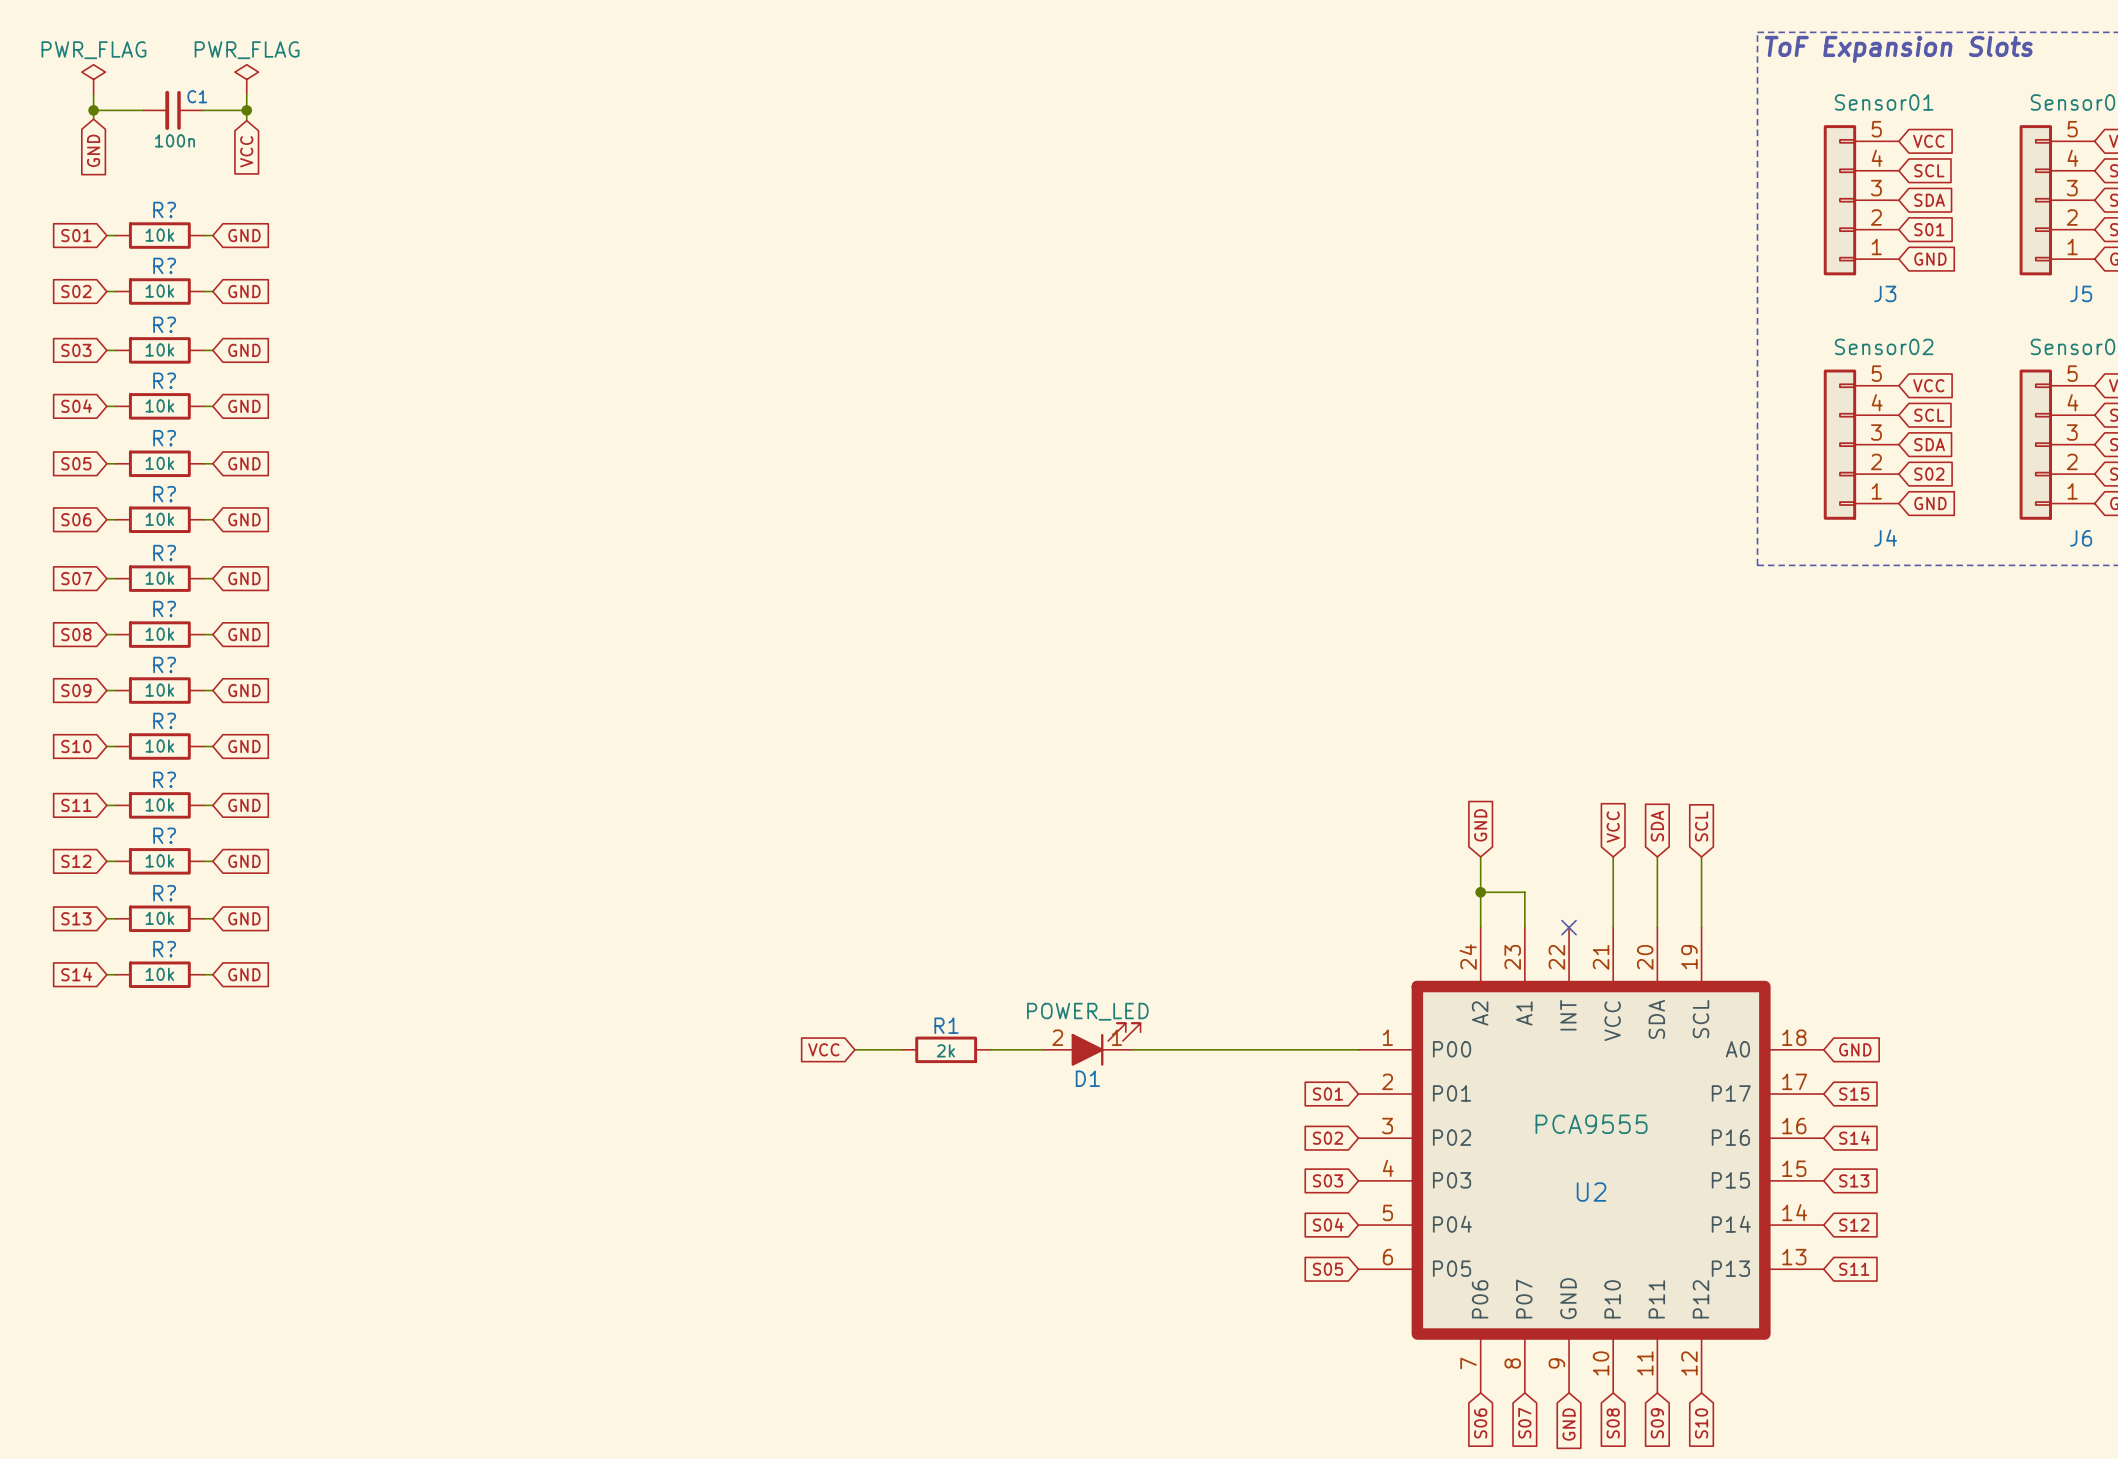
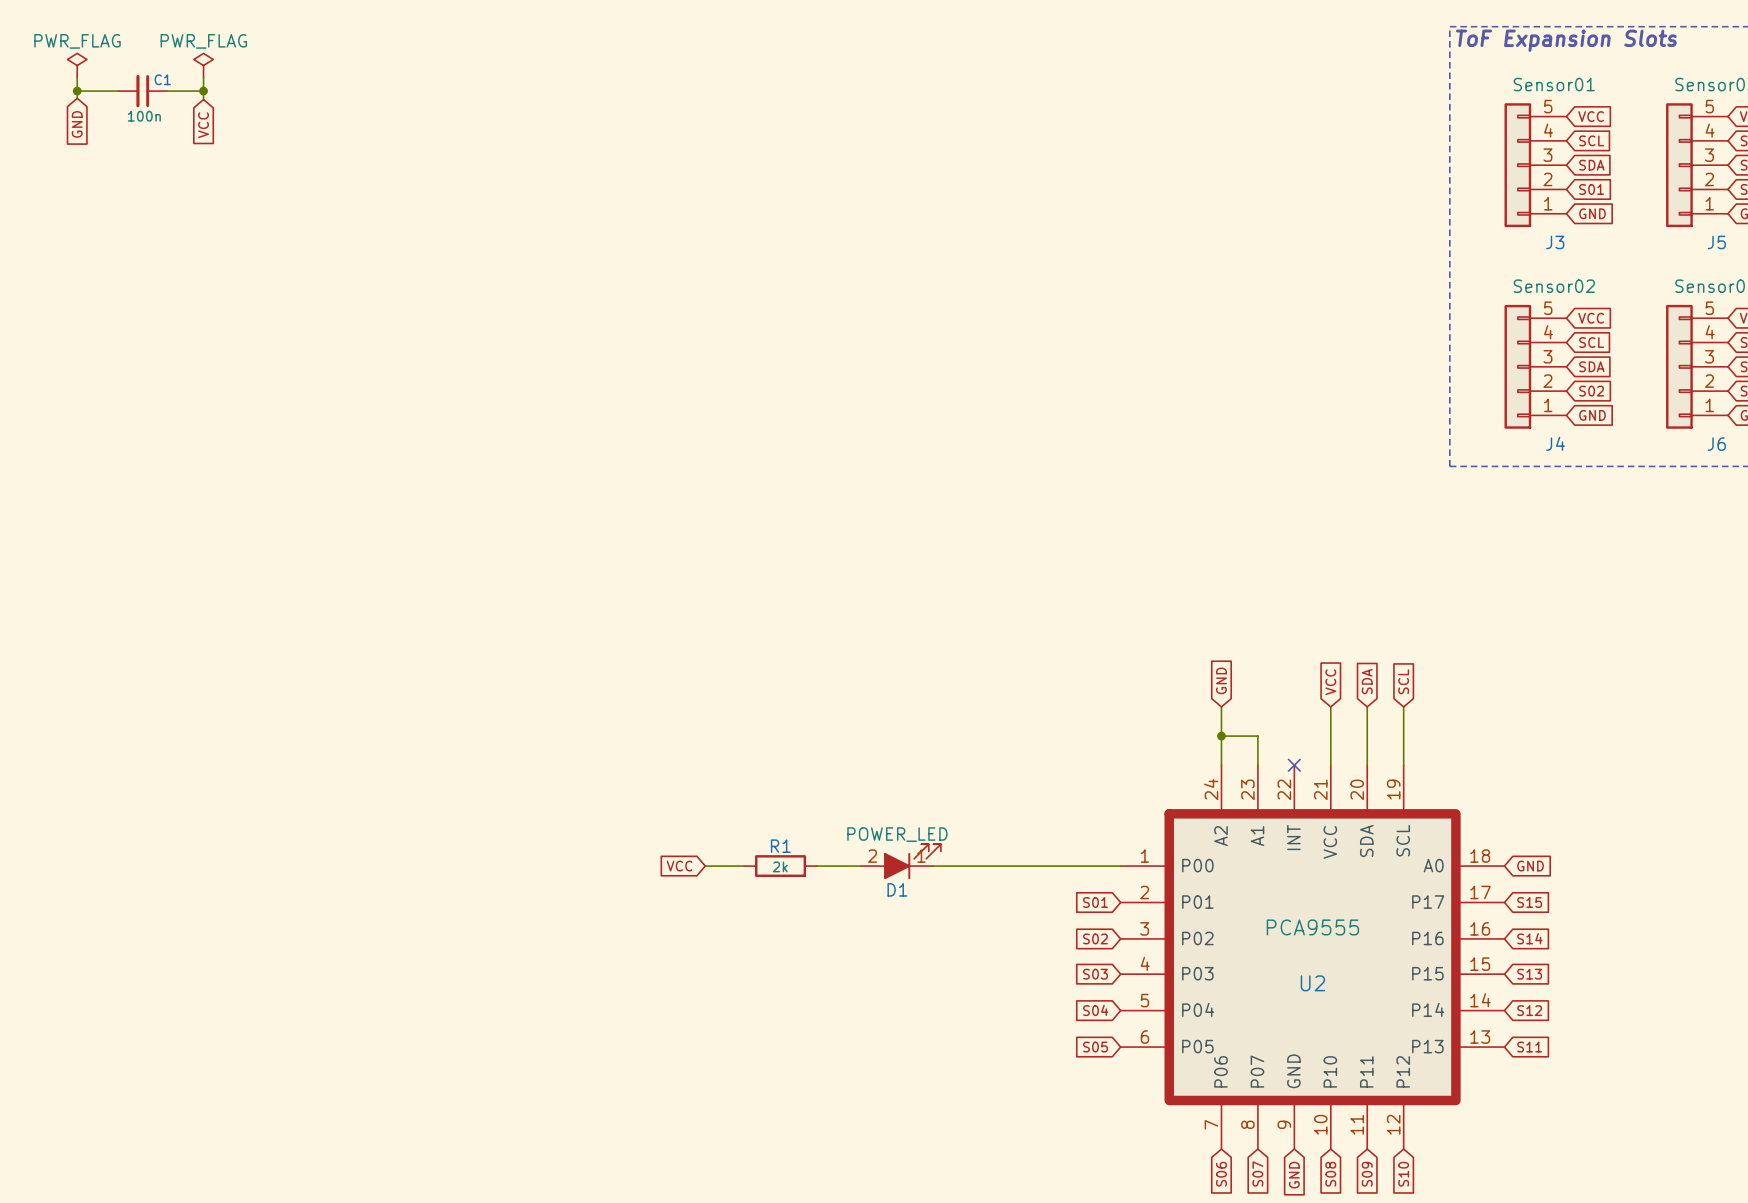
global label: S01 (76, 235) -> none
wire: (106, 235) (115, 235) -> none
R?: 10k (159, 235) -> none
wire: (204, 235) (212, 235) -> none
global label: GND (244, 235) -> none
global label: S02 (76, 291) -> none
wire: (106, 291) (115, 291) -> none
R?: 10k (159, 291) -> none
wire: (204, 291) (212, 291) -> none
global label: GND (244, 291) -> none
global label: S03 (76, 350) -> none
wire: (106, 350) (115, 350) -> none
R?: 10k (159, 350) -> none
wire: (204, 350) (212, 350) -> none
global label: GND (244, 350) -> none
global label: S04 (76, 406) -> none
wire: (106, 406) (115, 406) -> none
R?: 10k (159, 406) -> none
wire: (204, 406) (212, 406) -> none
global label: GND (244, 406) -> none
global label: S05 (76, 463) -> none
wire: (106, 463) (115, 463) -> none
R?: 10k (159, 463) -> none
wire: (204, 463) (212, 463) -> none
global label: GND (244, 463) -> none
global label: S06 (76, 519) -> none
wire: (106, 519) (115, 519) -> none
R?: 10k (159, 519) -> none
wire: (204, 519) (212, 519) -> none
global label: GND (244, 519) -> none
global label: S07 (76, 578) -> none
wire: (106, 578) (115, 578) -> none
R?: 10k (159, 578) -> none
wire: (204, 578) (212, 578) -> none
global label: GND (244, 578) -> none
global label: S08 (76, 634) -> none
wire: (106, 634) (115, 634) -> none
R?: 10k (159, 634) -> none
wire: (204, 634) (212, 634) -> none
global label: GND (244, 634) -> none
global label: S09 (76, 690) -> none
wire: (106, 690) (115, 690) -> none
R?: 10k (159, 690) -> none
wire: (204, 690) (212, 690) -> none
global label: GND (244, 690) -> none
global label: S10 (76, 746) -> none
wire: (106, 746) (115, 746) -> none
R?: 10k (159, 746) -> none
wire: (204, 746) (212, 746) -> none
global label: GND (244, 746) -> none
global label: S11 (76, 805) -> none
wire: (106, 805) (115, 805) -> none
R?: 10k (159, 805) -> none
wire: (204, 805) (212, 805) -> none
global label: GND (244, 805) -> none
global label: S12 (76, 861) -> none
wire: (106, 861) (115, 861) -> none
R?: 10k (159, 861) -> none
wire: (204, 861) (212, 861) -> none
global label: GND (244, 861) -> none
global label: S13 (76, 918) -> none
wire: (106, 918) (115, 918) -> none
R?: 10k (159, 918) -> none
wire: (204, 918) (212, 918) -> none
global label: GND (244, 918) -> none
global label: S14 (76, 974) -> none
wire: (106, 974) (115, 974) -> none
R?: 10k (159, 974) -> none
wire: (204, 974) (212, 974) -> none
global label: GND (244, 974) -> none

